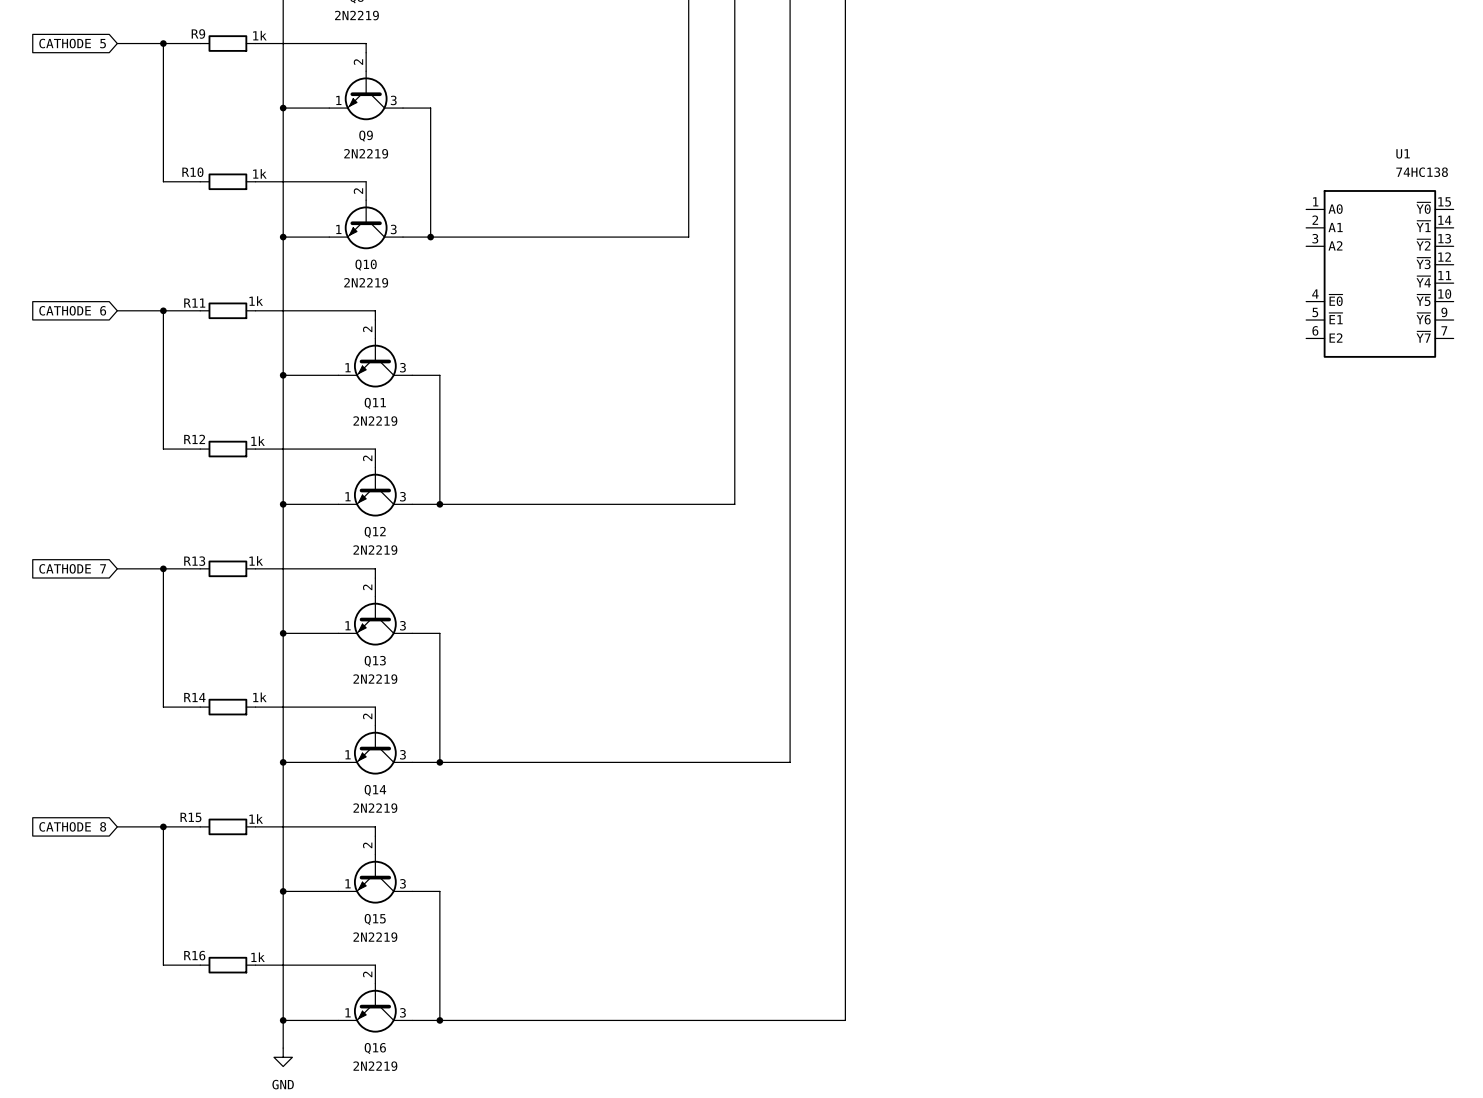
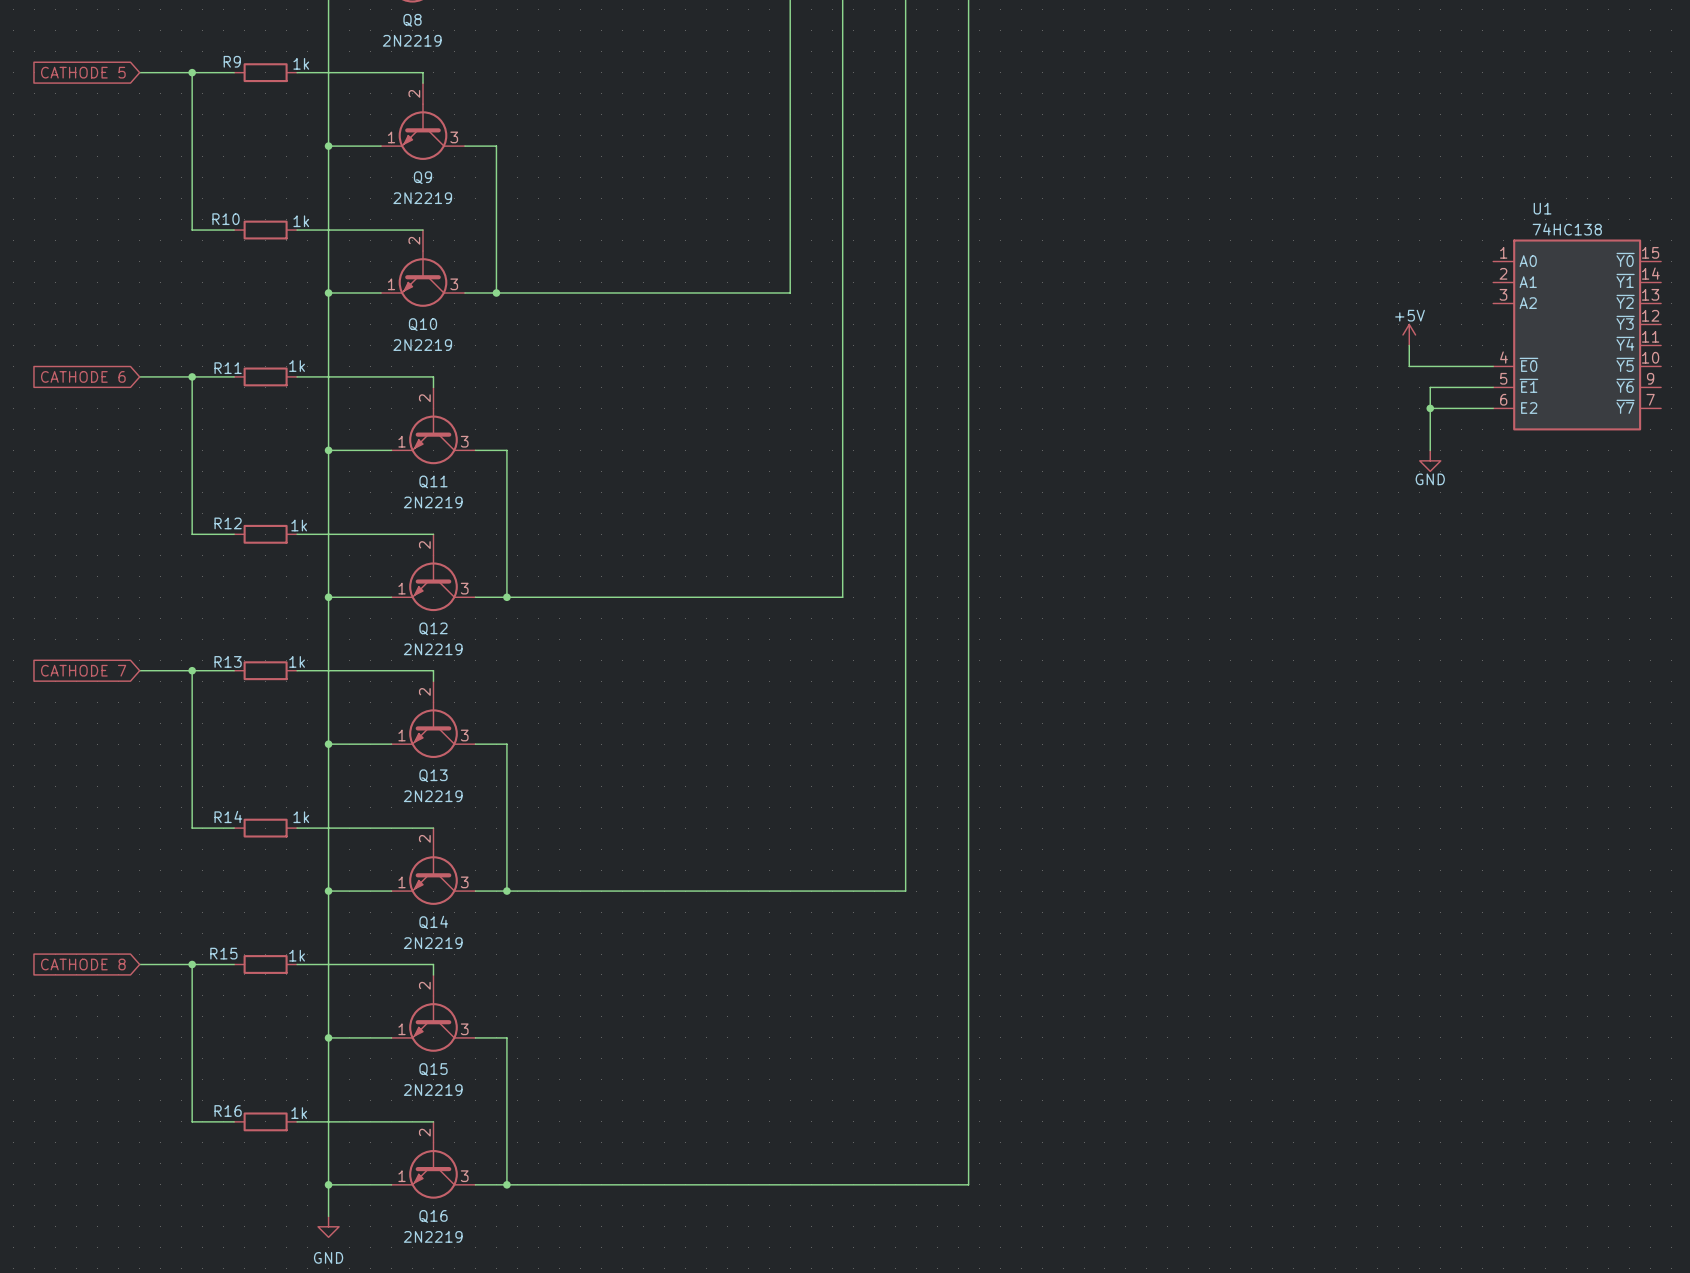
U1 name position: U1 (1403, 153) -> U1 (1542, 208)
U1 value position: 74HC138 (1422, 172) -> 74HC138 (1567, 229)
power symbol: none -> +5V (1409, 334)
wire: none -> (1409, 345) (1409, 366) (1493, 366)
wire: none -> (1493, 387) (1430, 387) (1430, 450)
wire: none -> (1430, 408) (1493, 408)
junction: none -> (1430, 408)
power symbol: none -> GND (1430, 460)

